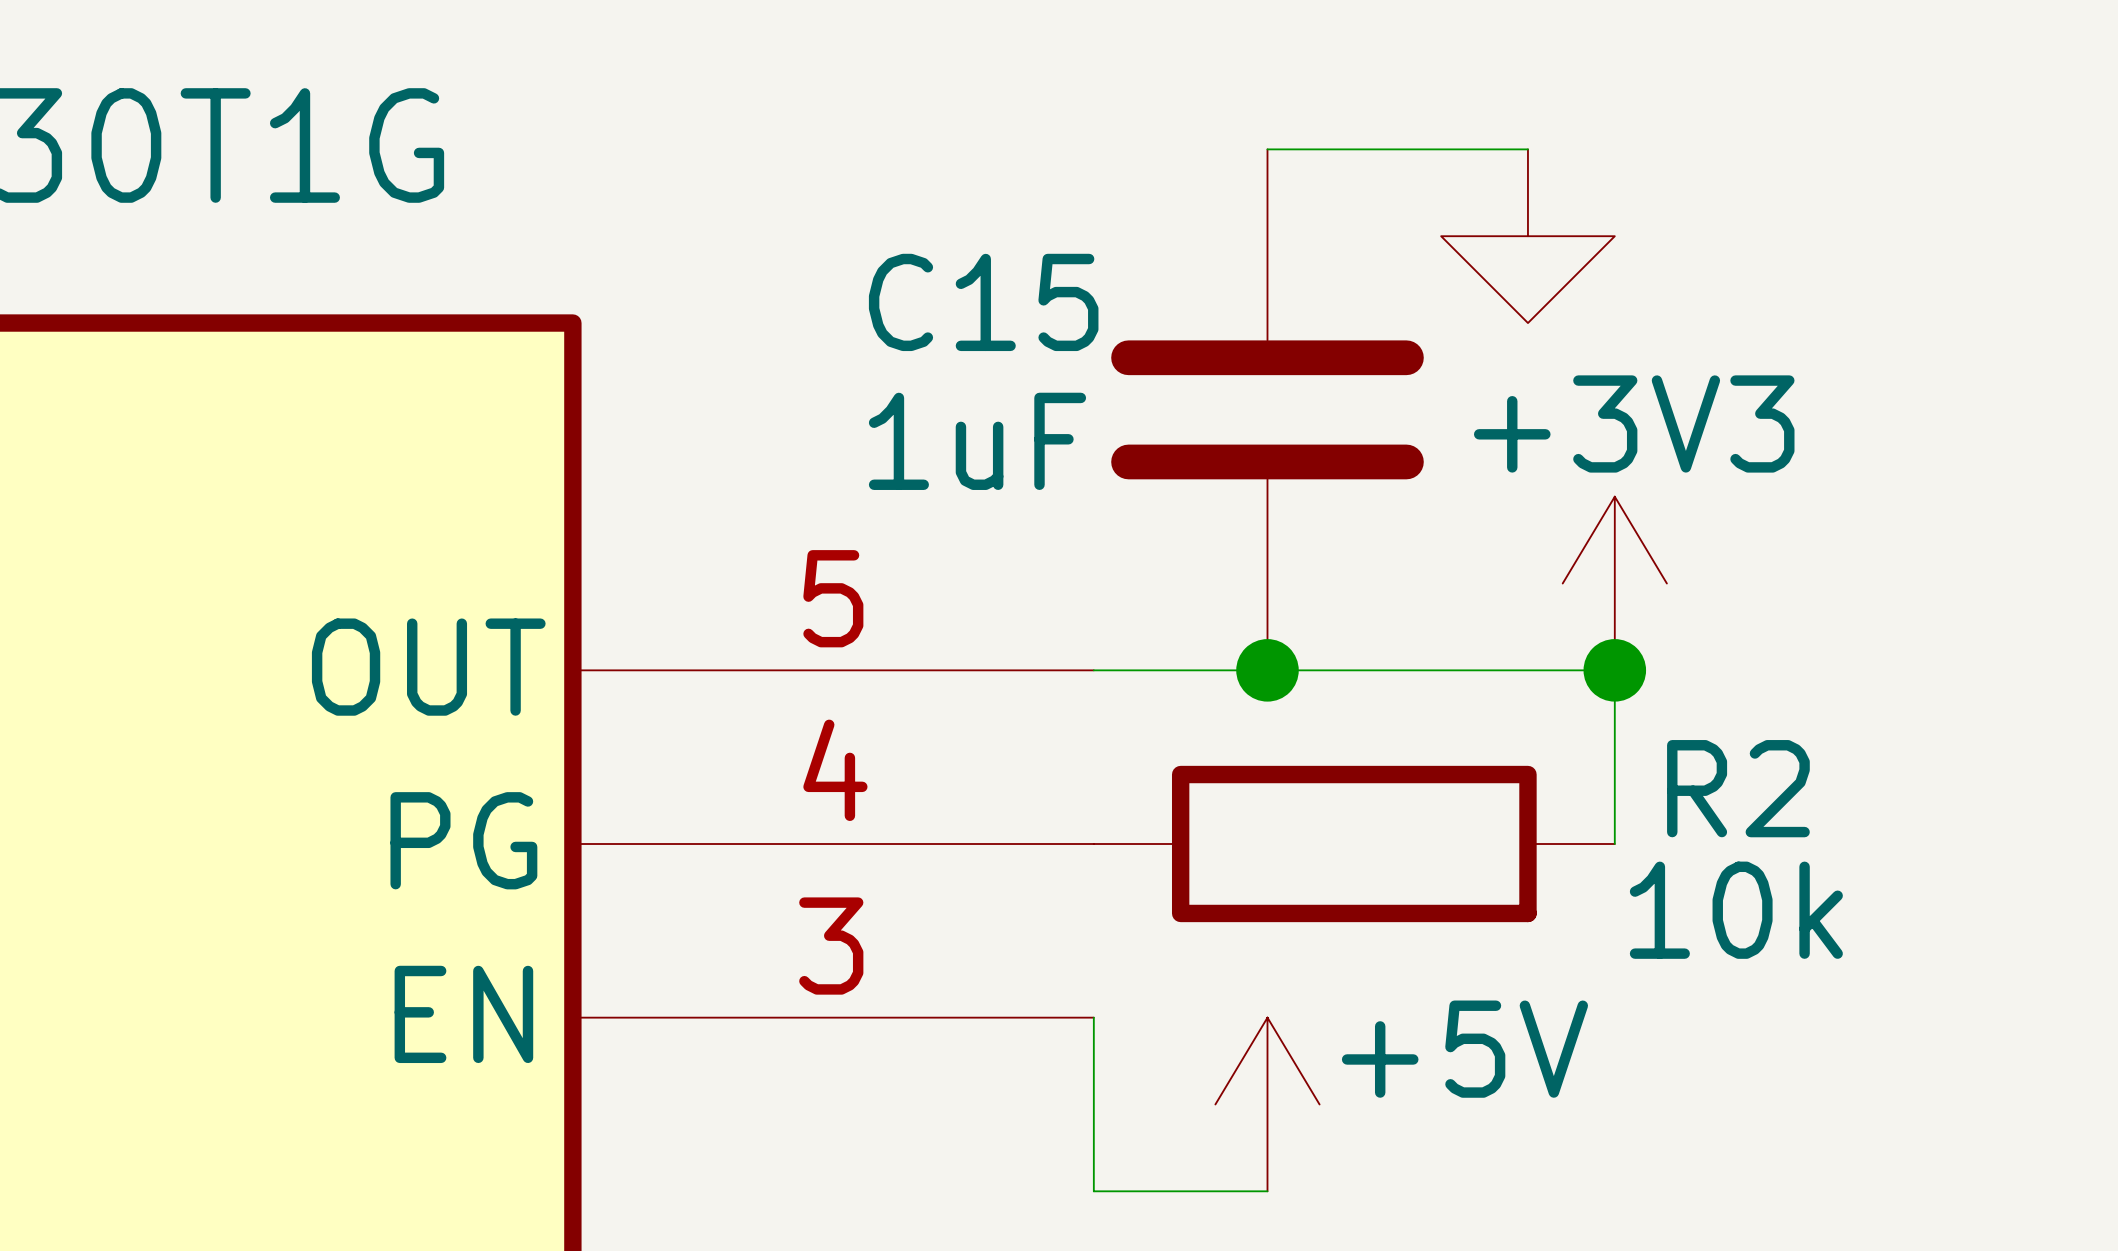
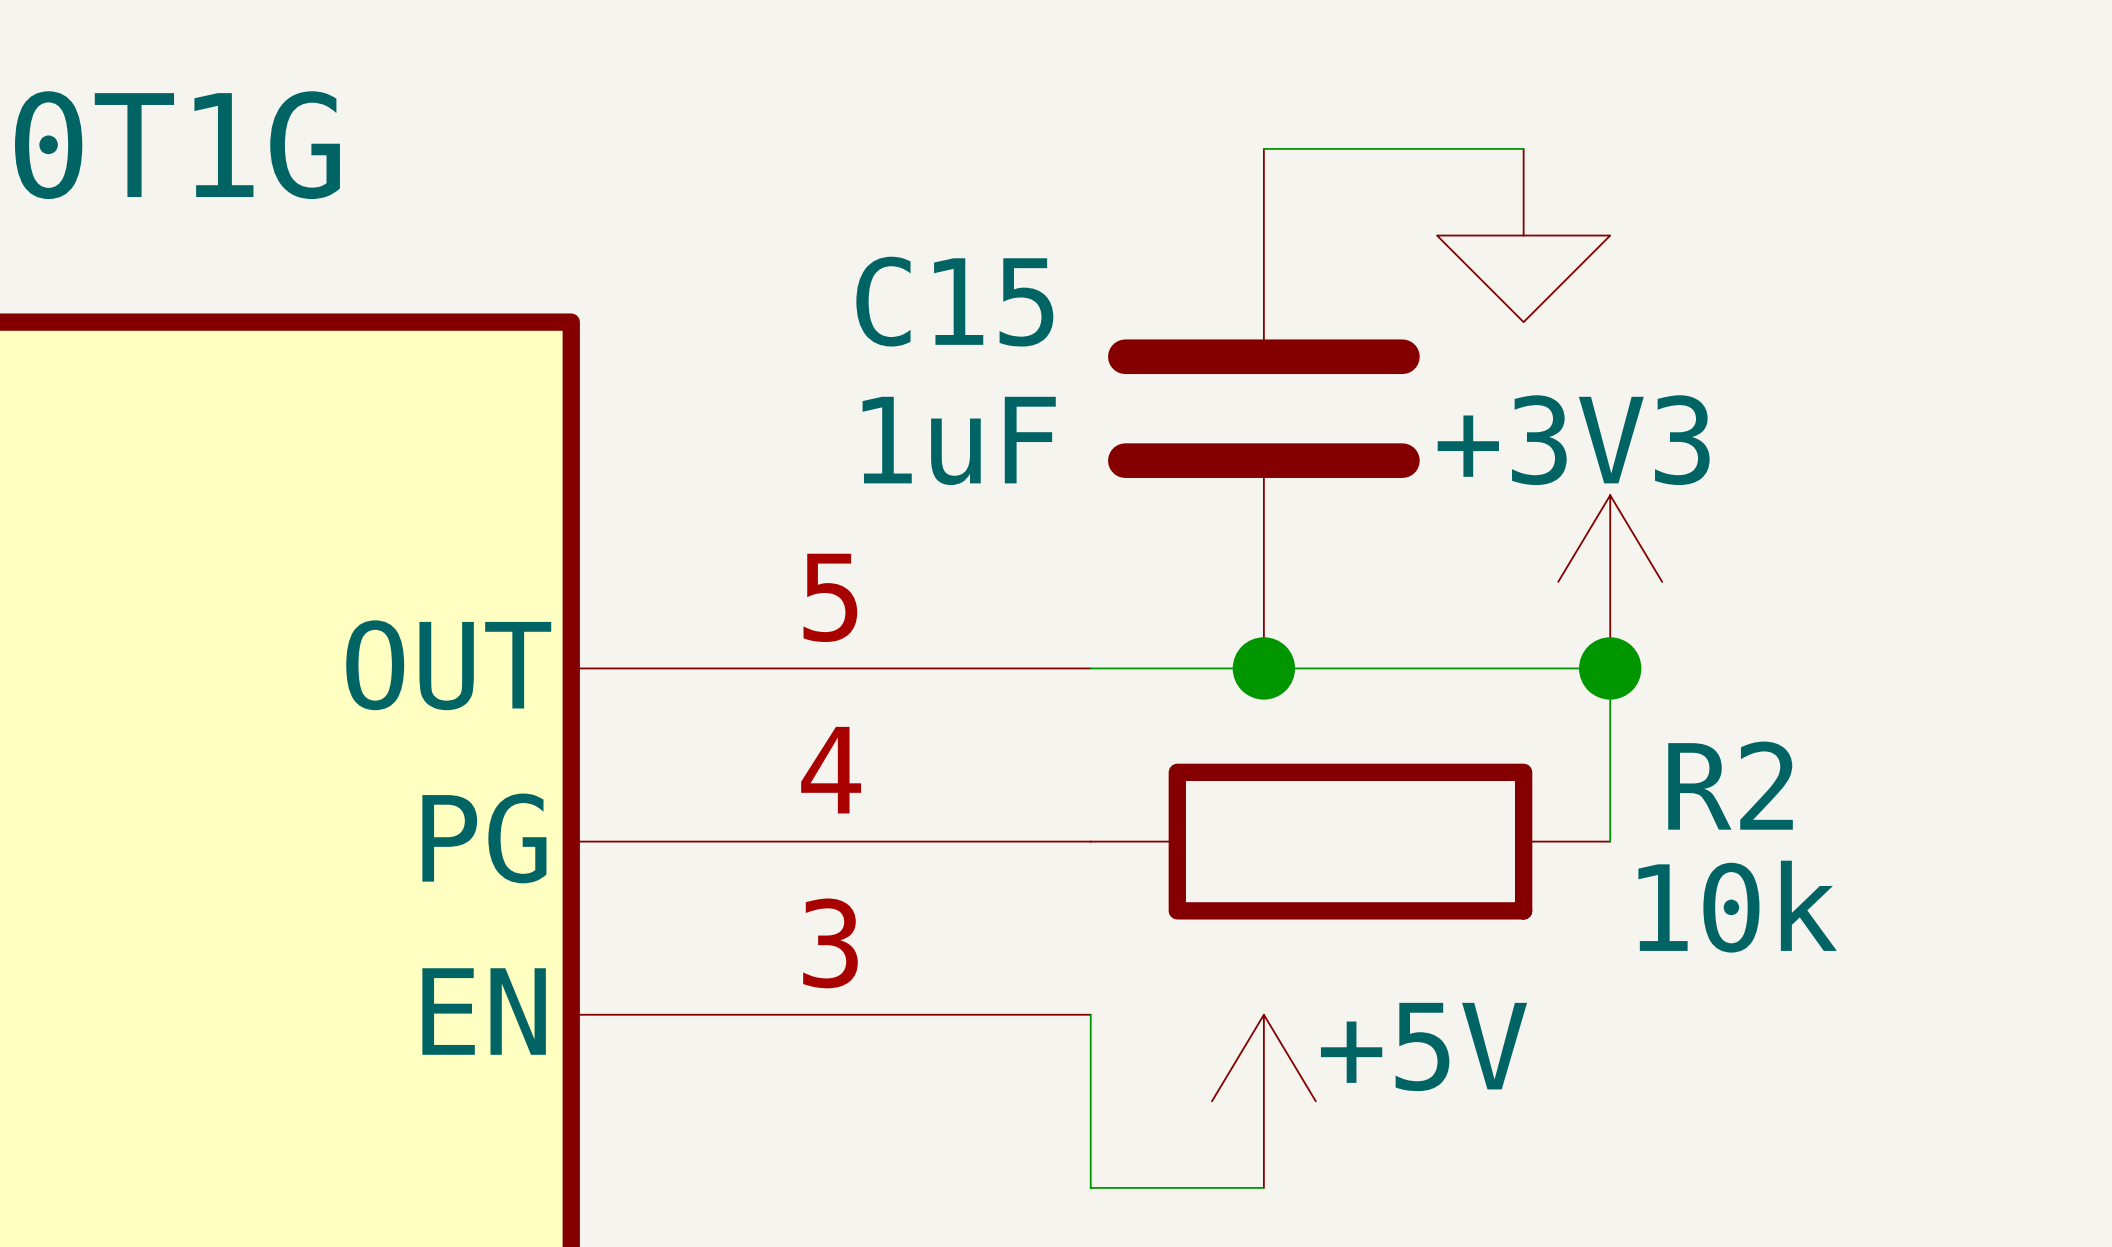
power symbol text position: +3V3 (1634, 423) -> +3V3 (1573, 440)

